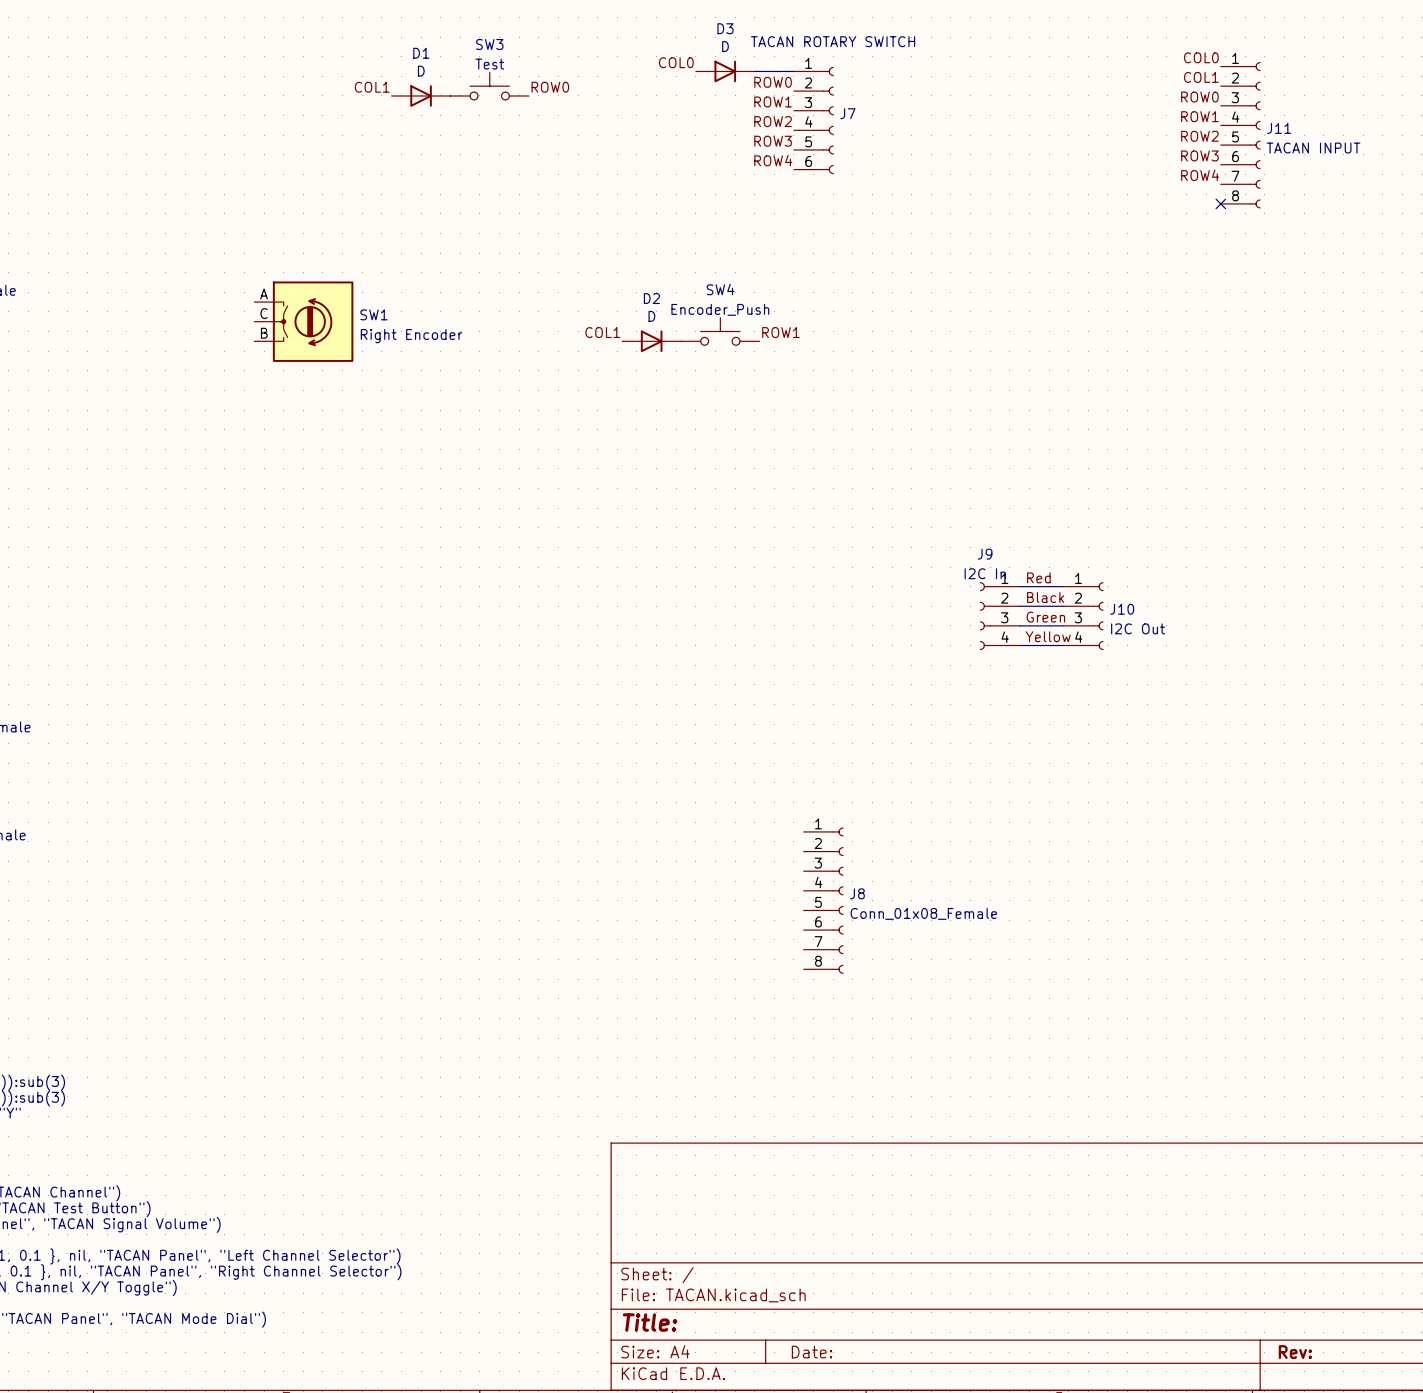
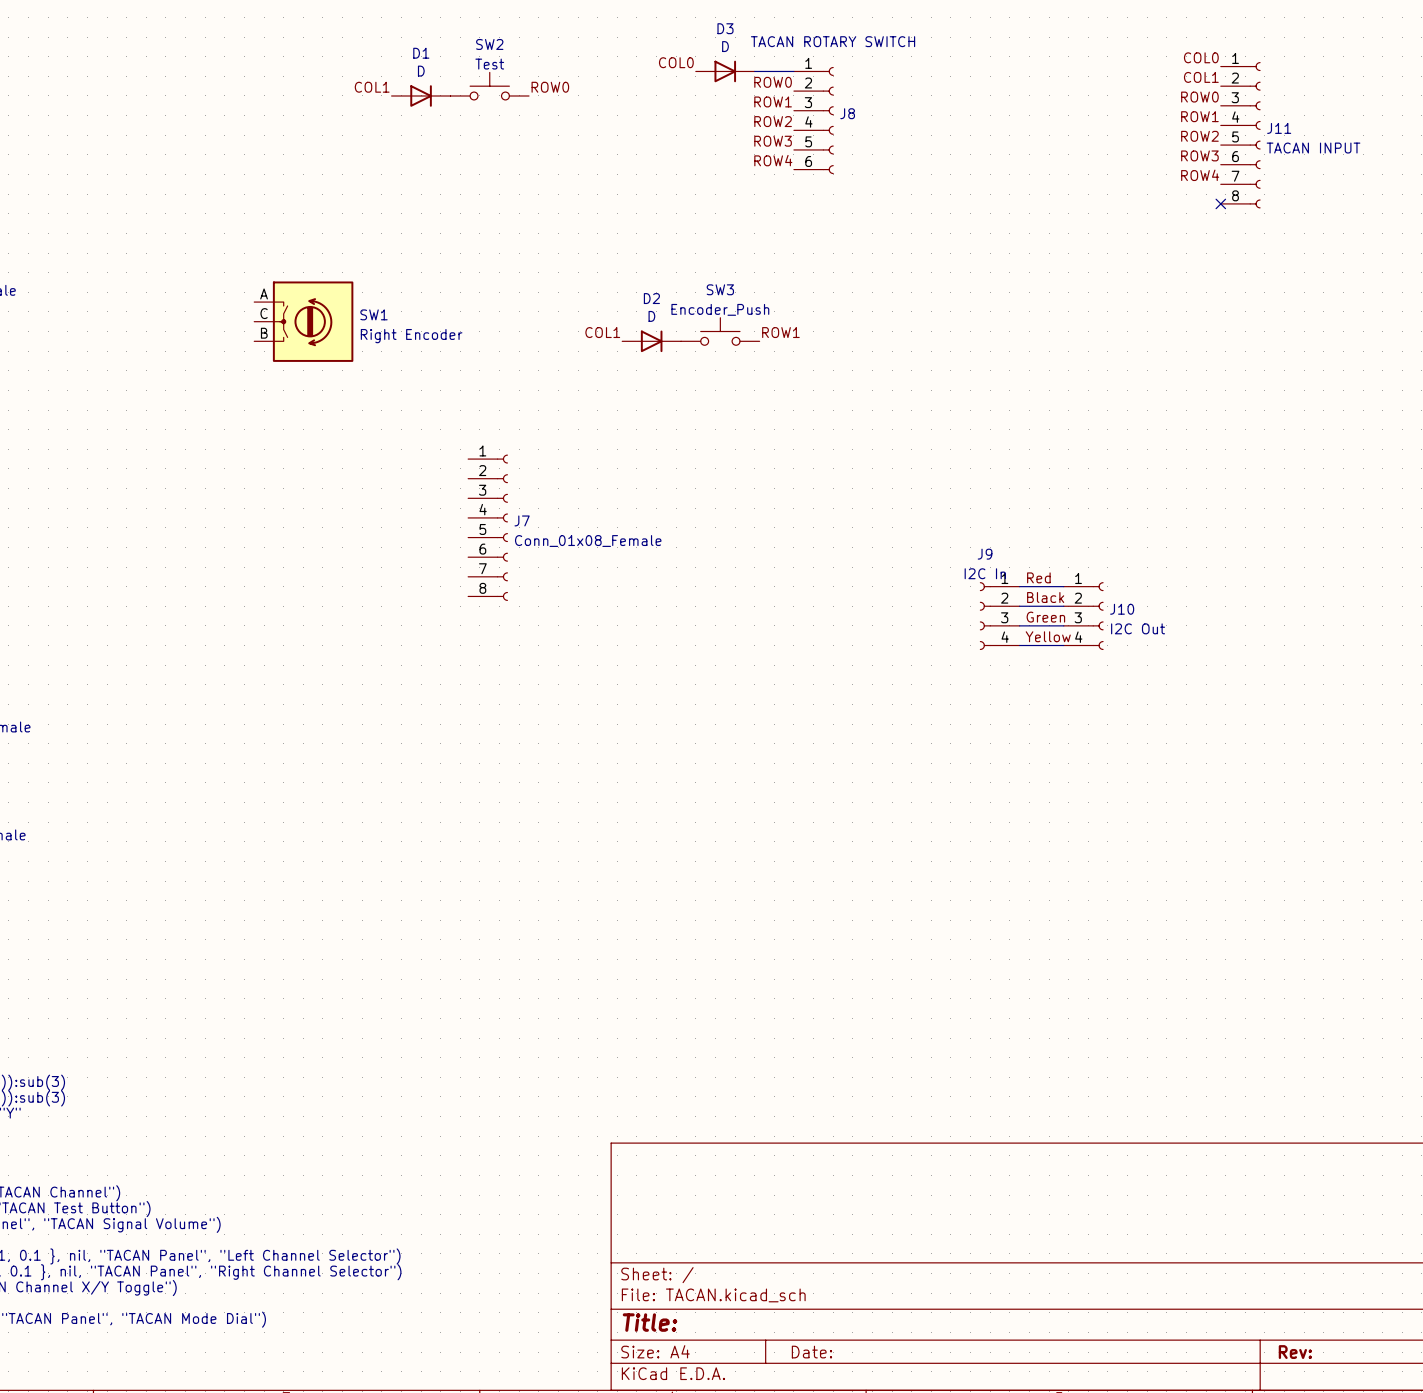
SW3 name: SW3 (489, 44) -> SW2 (489, 44)
J7 name: J7 (847, 113) -> J8 (847, 113)
SW4 name: SW4 (720, 289) -> SW3 (720, 289)
J7: none -> Conn_01x08_Female (488, 527)
J8: Conn_01x08_Female (823, 900) -> none

